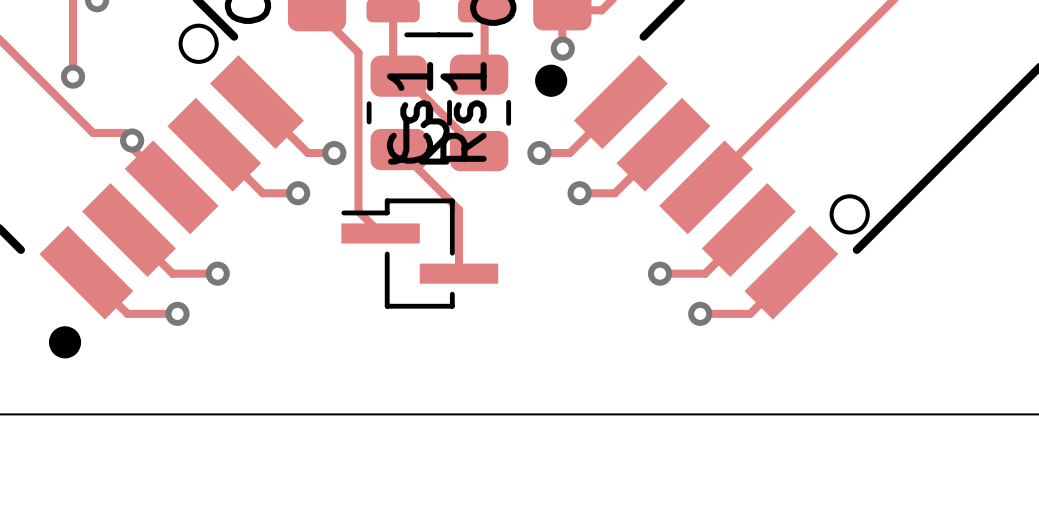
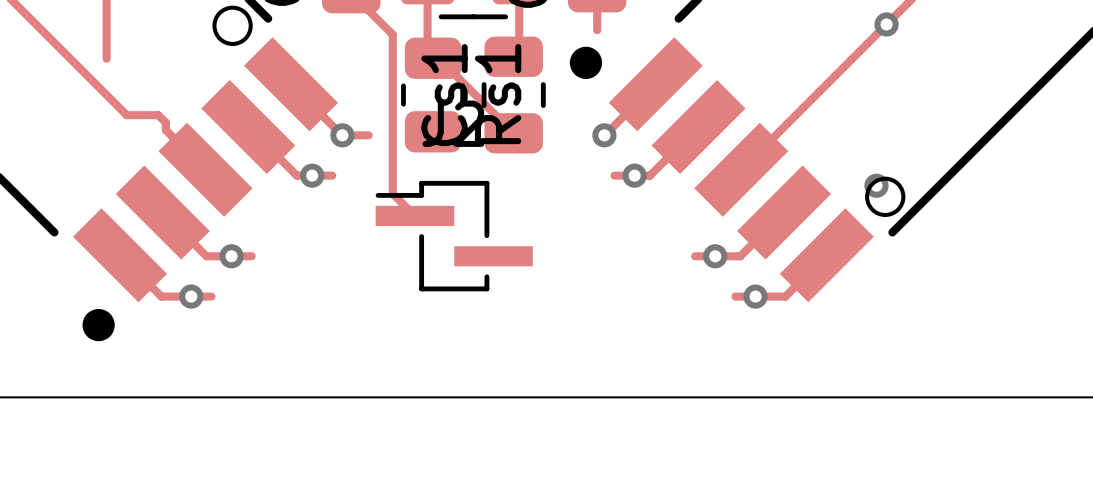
via: none -> (886, 24)
via: (562, 48) -> none
via: (72, 76) -> none
via: (132, 140) -> none
track: (398, 149) (458, 209) (458, 273) -> none
via: none -> (342, 135)
via: (334, 153) -> none
track: (539, 153) (569, 153) -> none
via: (539, 153) -> none
via: none -> (604, 135)
via position: (298, 193) -> (312, 175)
via position: (579, 193) -> (634, 175)
via: none -> (876, 185)
via position: (217, 273) -> (231, 256)
via position: (660, 273) -> (715, 256)
via position: (177, 313) -> (191, 296)
via position: (700, 313) -> (755, 296)

